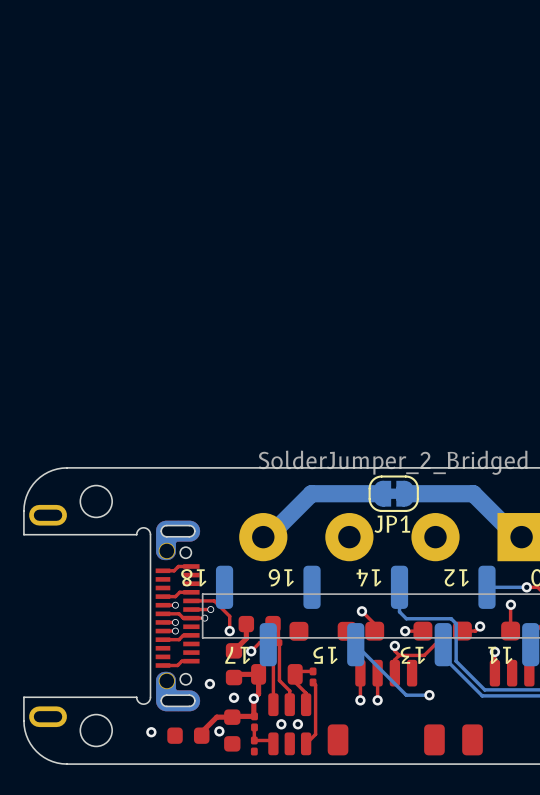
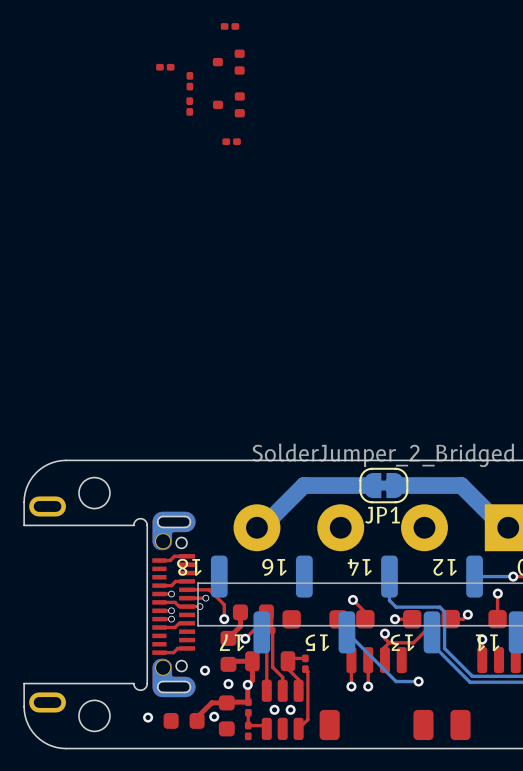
part: none -> (229, 26)
part: none -> (228, 62)
part: none -> (165, 67)
part: none -> (189, 81)
part: none -> (228, 104)
part: none -> (189, 106)
part: none -> (231, 141)

